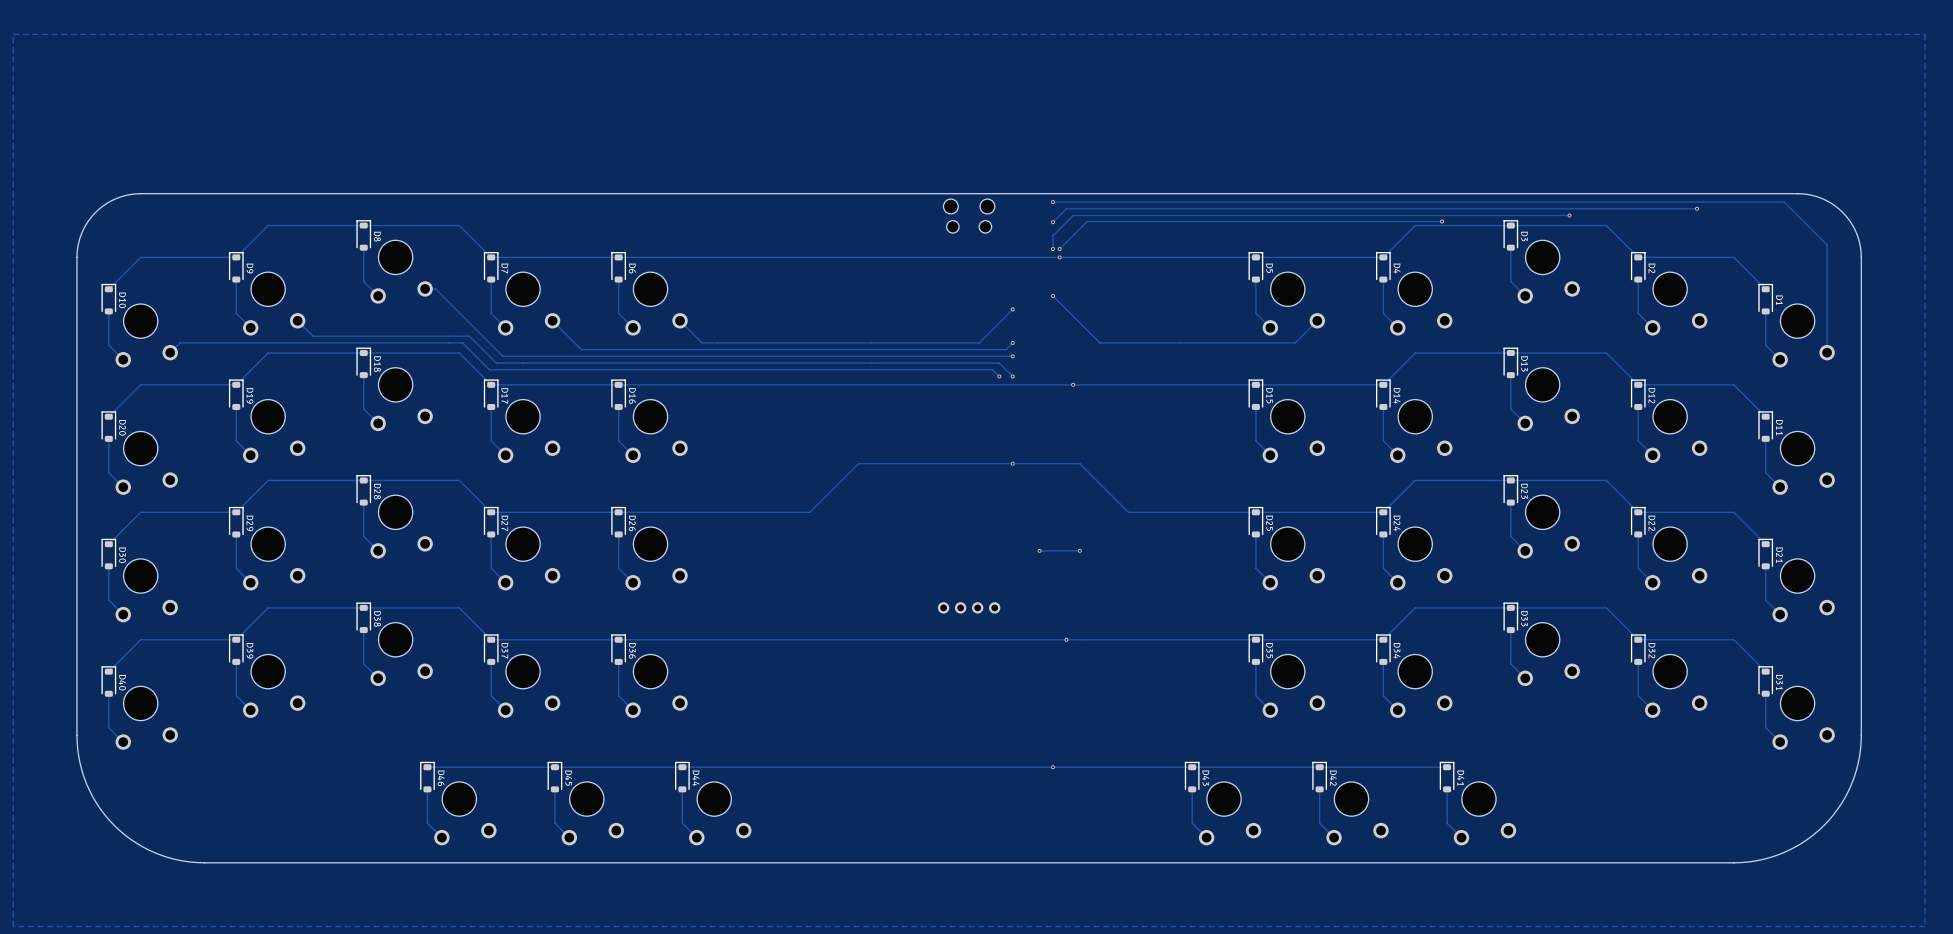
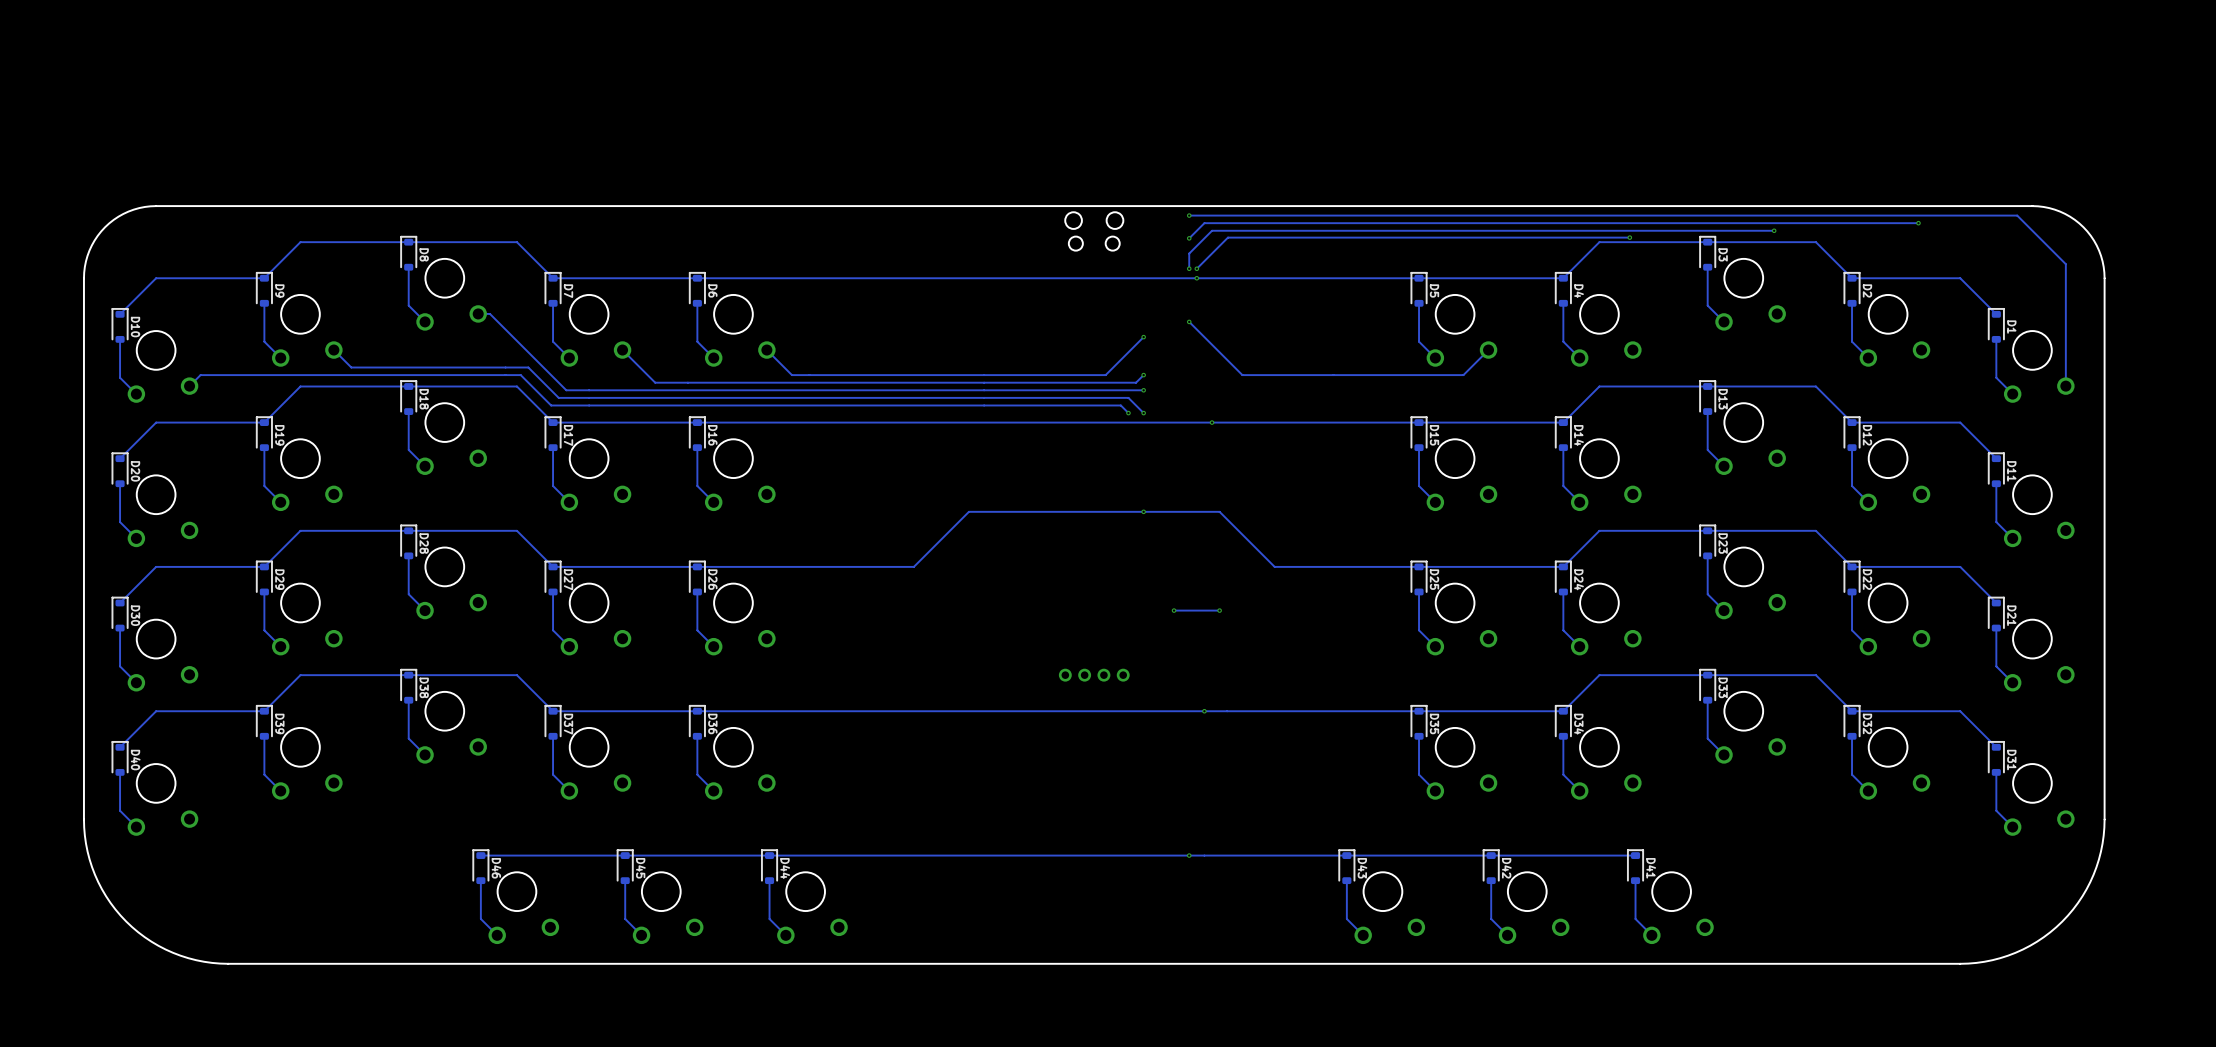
zone outline: (1925, 34) (1925, 926) (13, 926) (13, 34) (1925, 34) -> none

